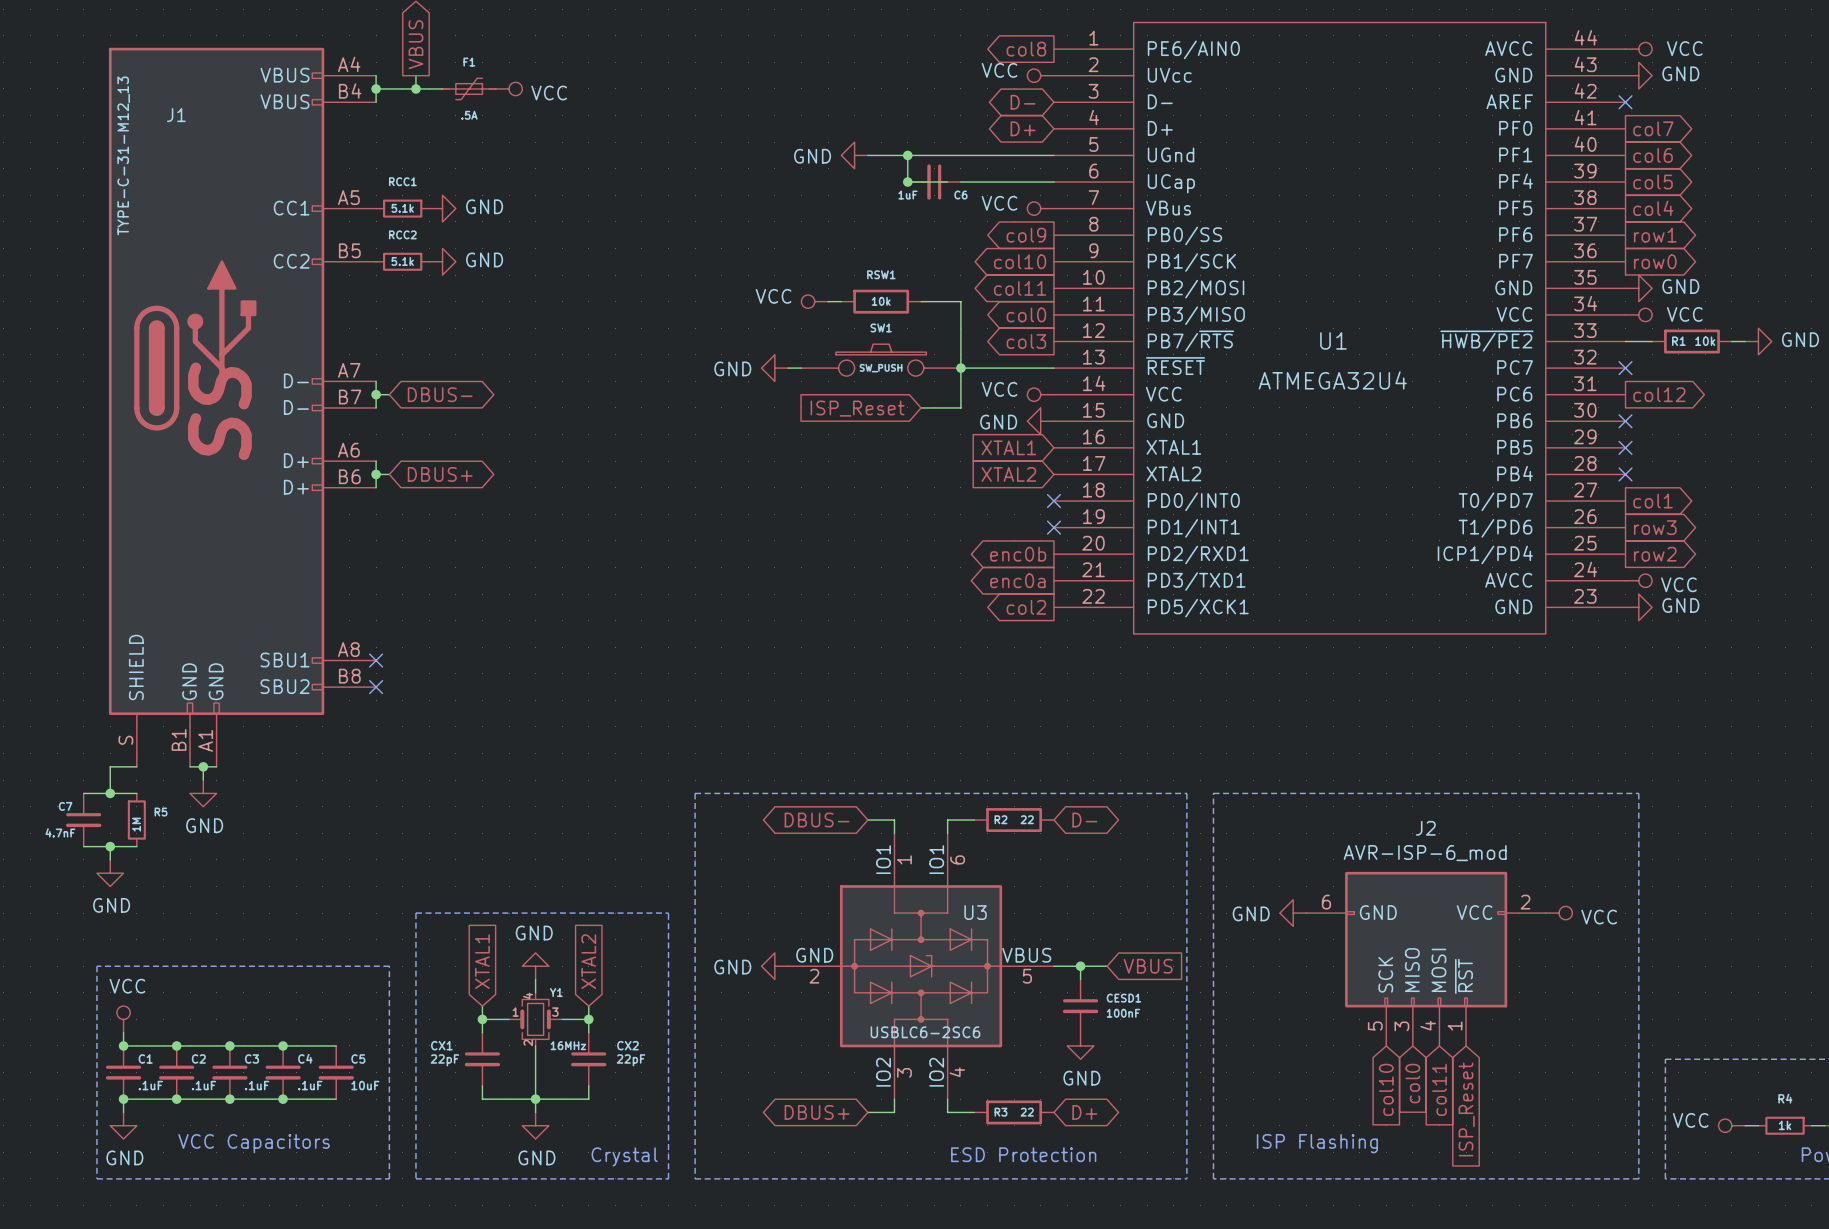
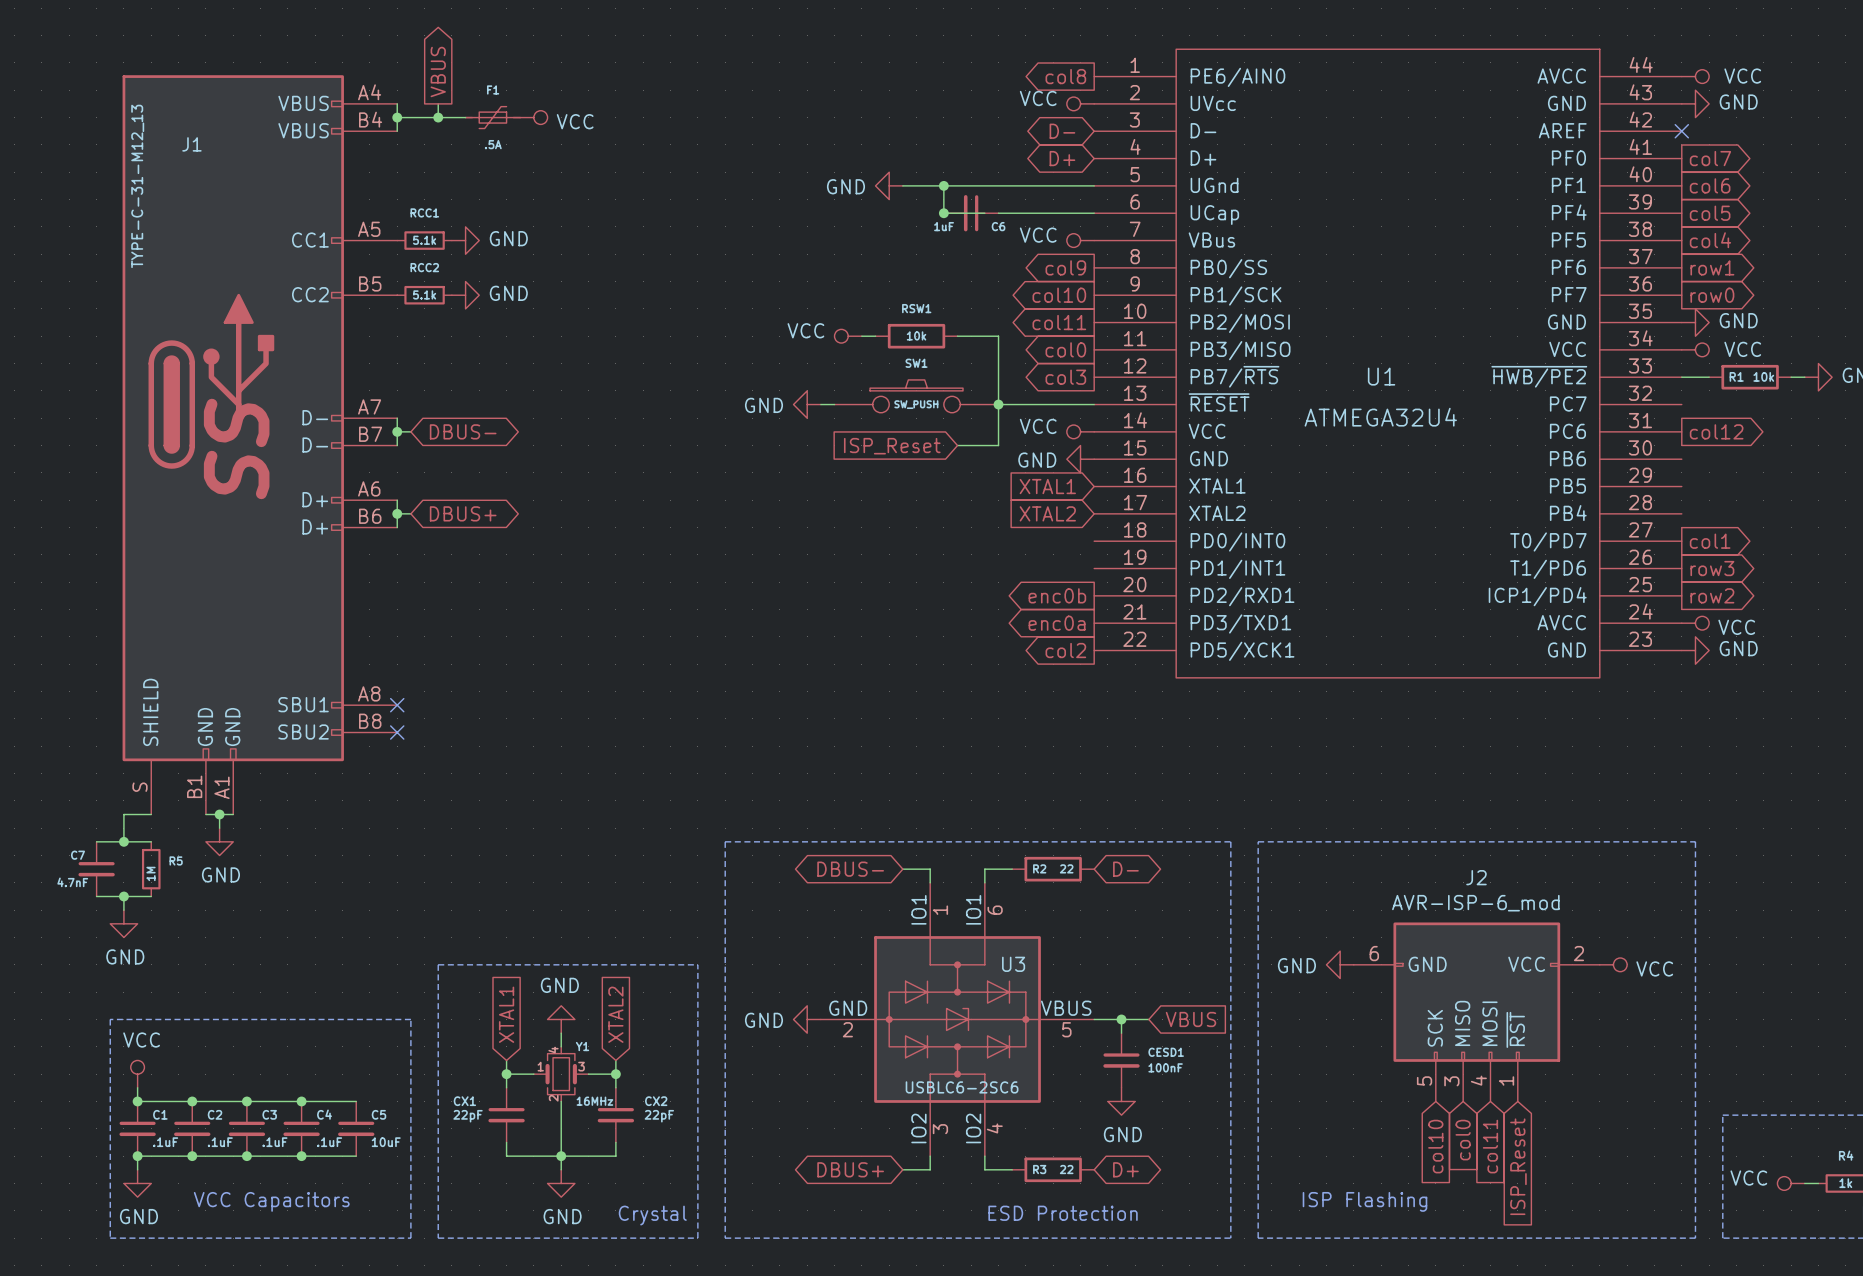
no-connect mark: (1625, 368) -> none
no-connect mark: (1625, 421) -> none
no-connect mark: (1625, 447) -> none
no-connect mark: (1625, 474) -> none
no-connect mark: (1053, 501) -> none
no-connect mark: (1053, 527) -> none

